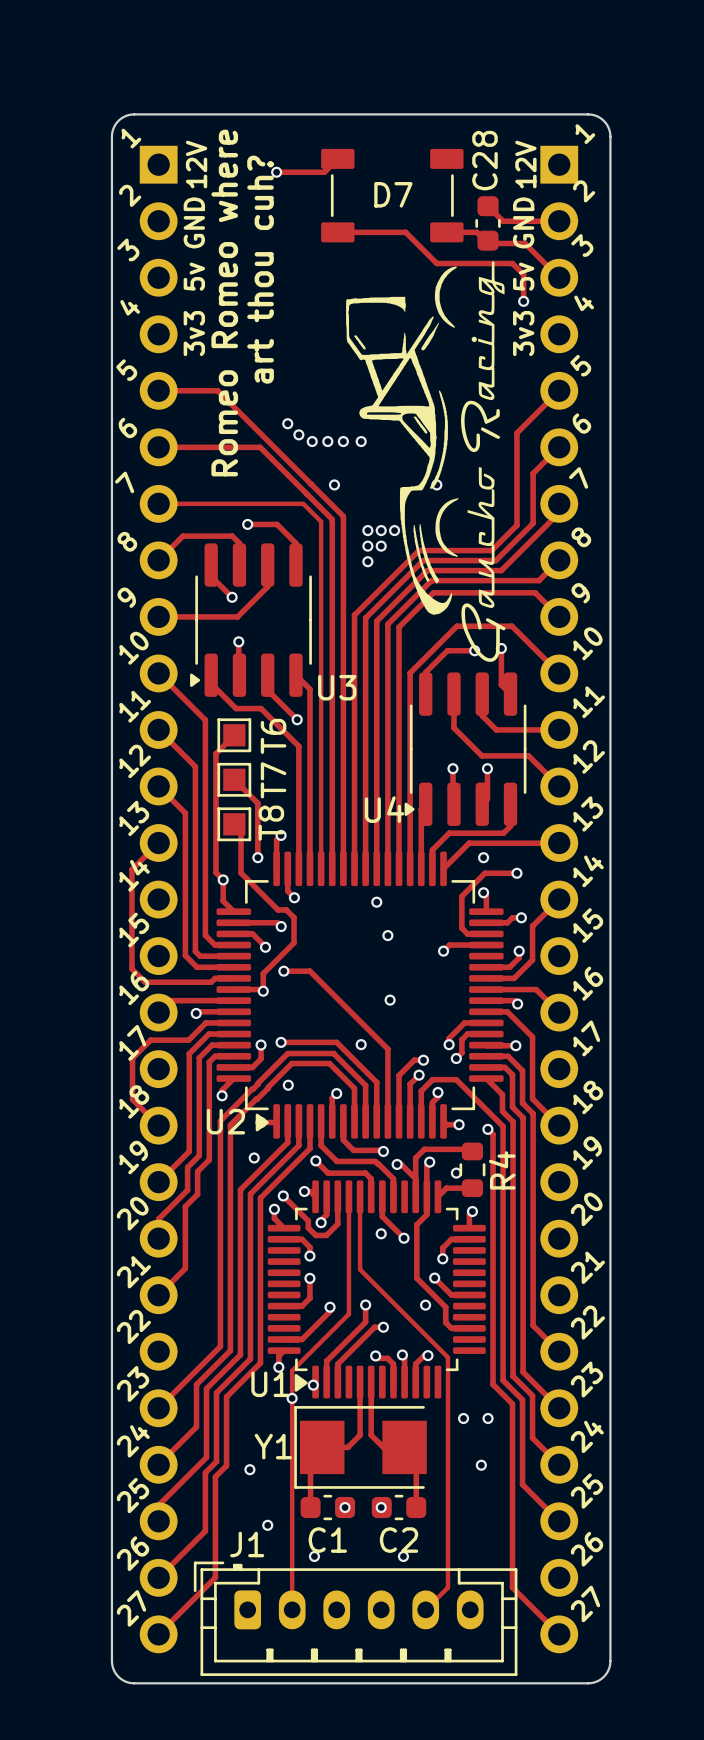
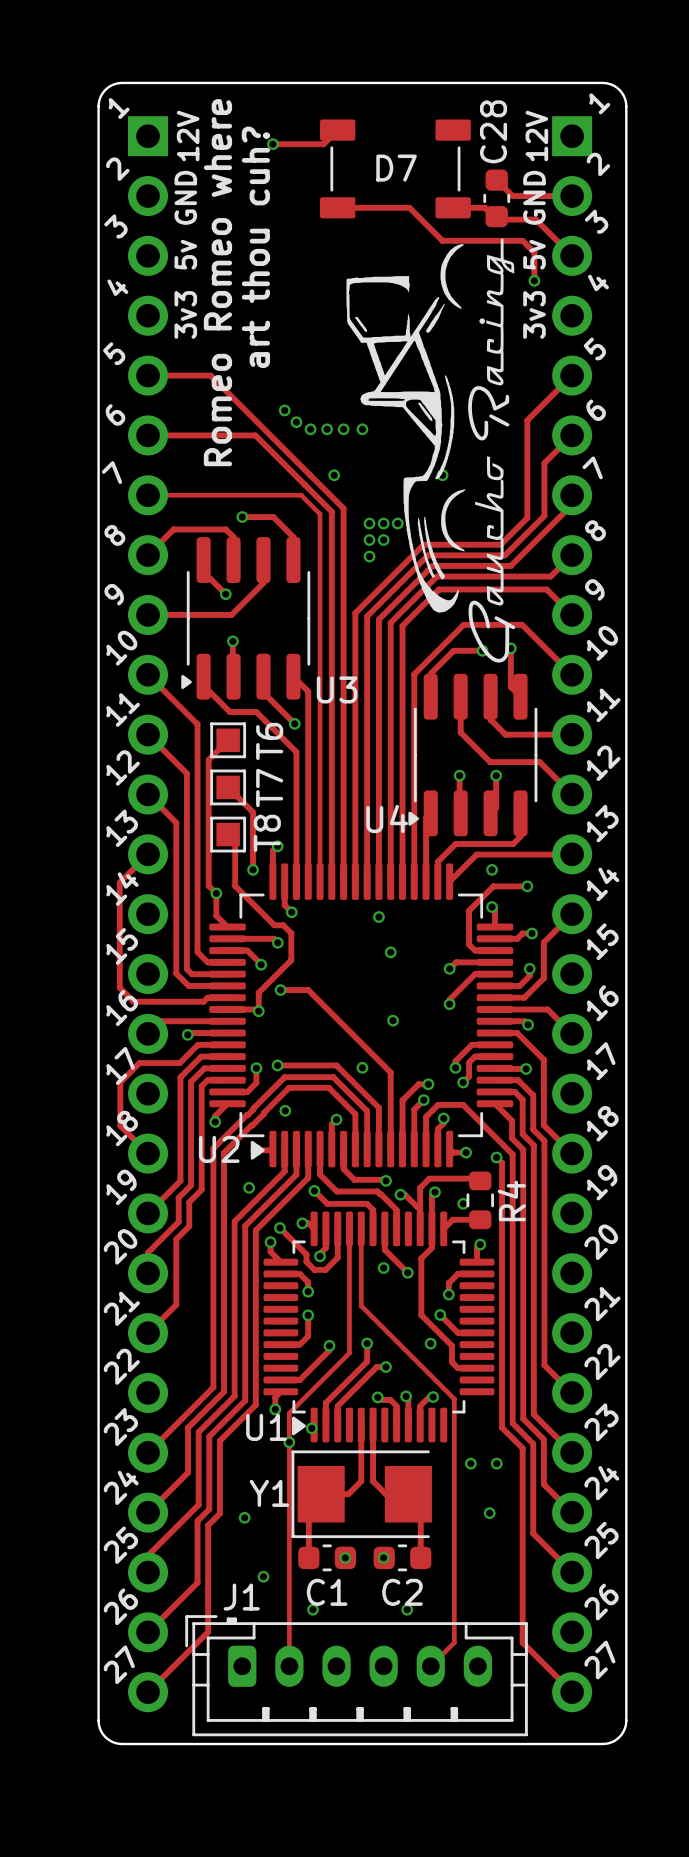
track: none -> (494, 974) (475, 974) (449, 999) (449, 1004)
via: none -> (449, 1004)

